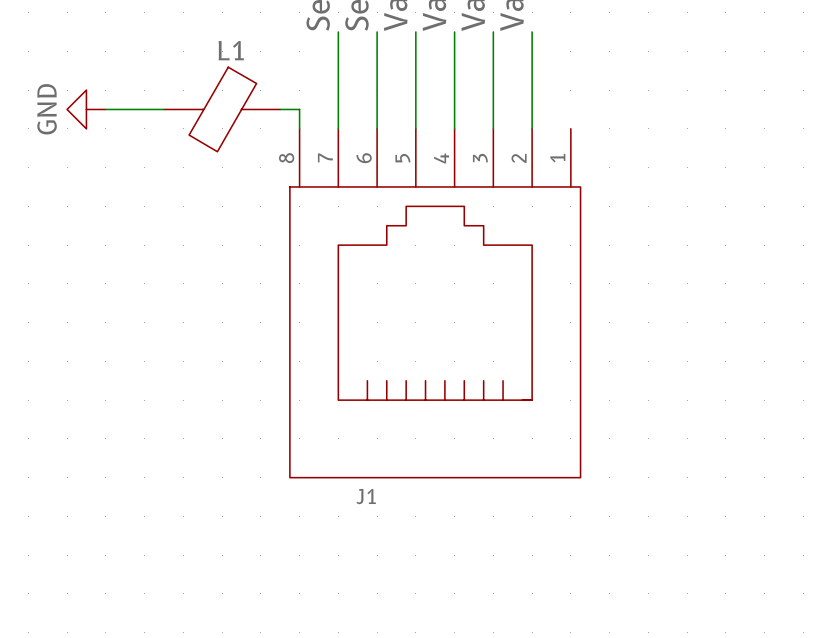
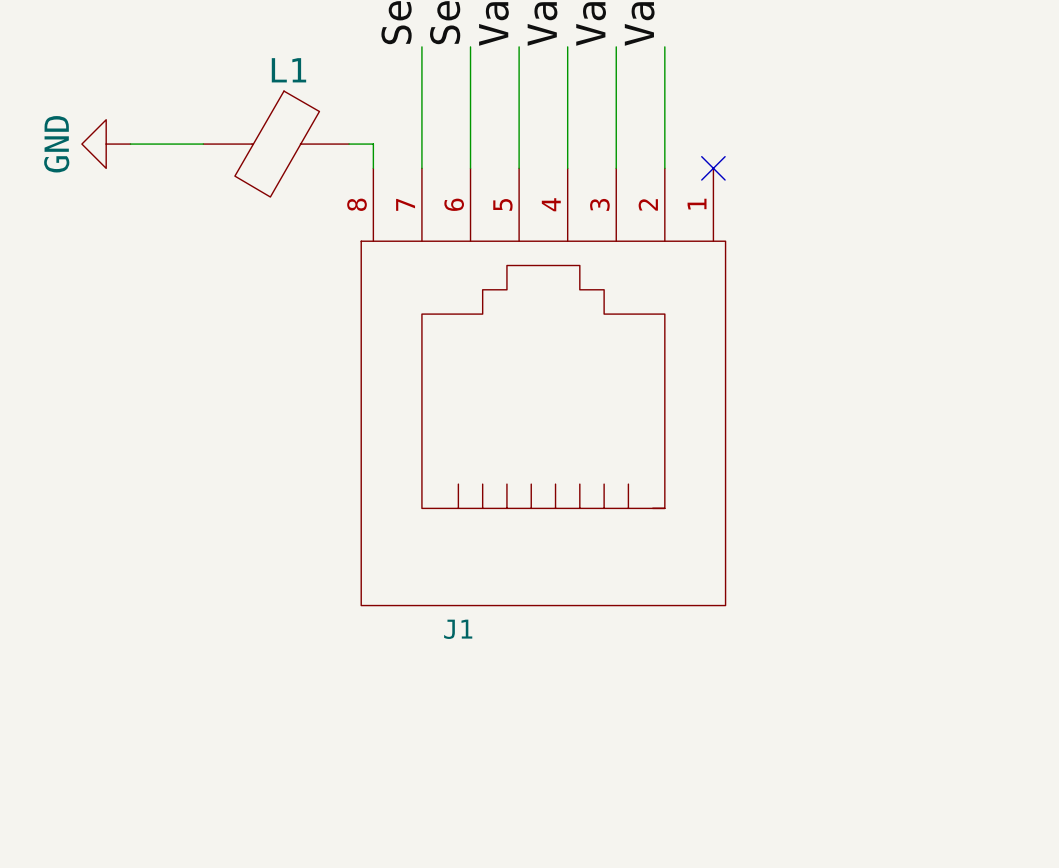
no-connect mark: none -> (713, 168)

